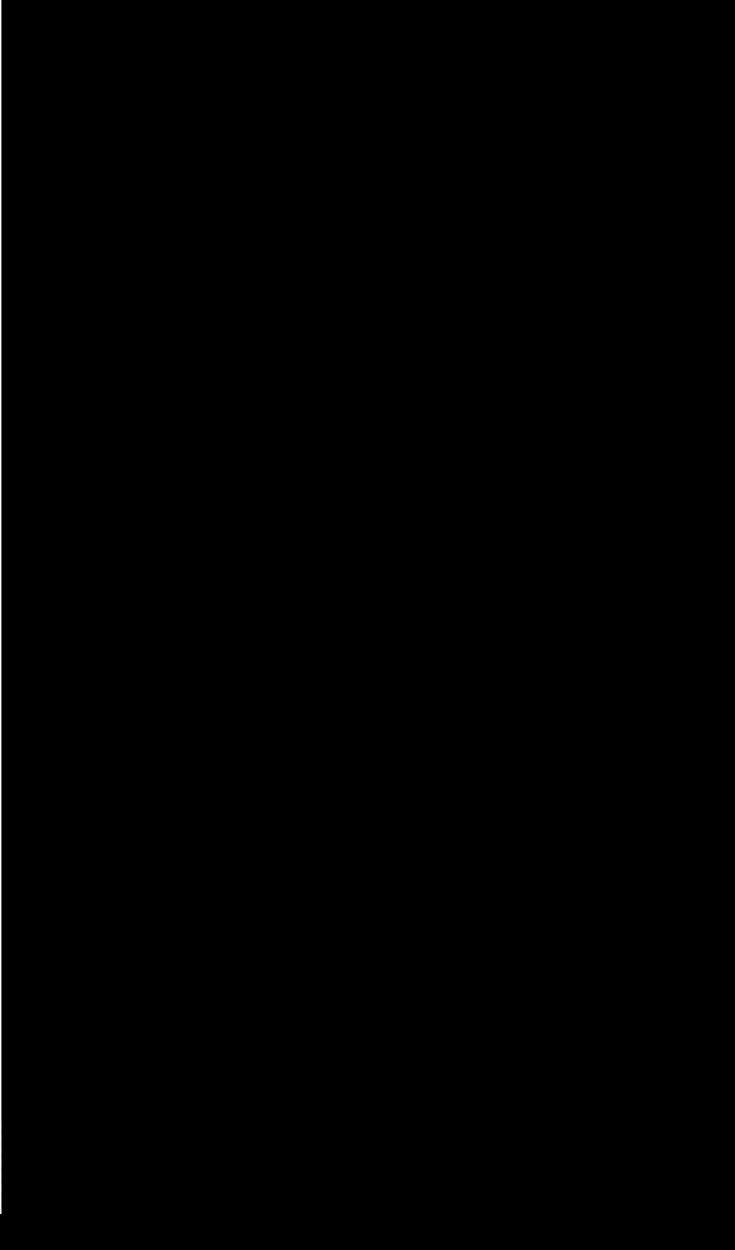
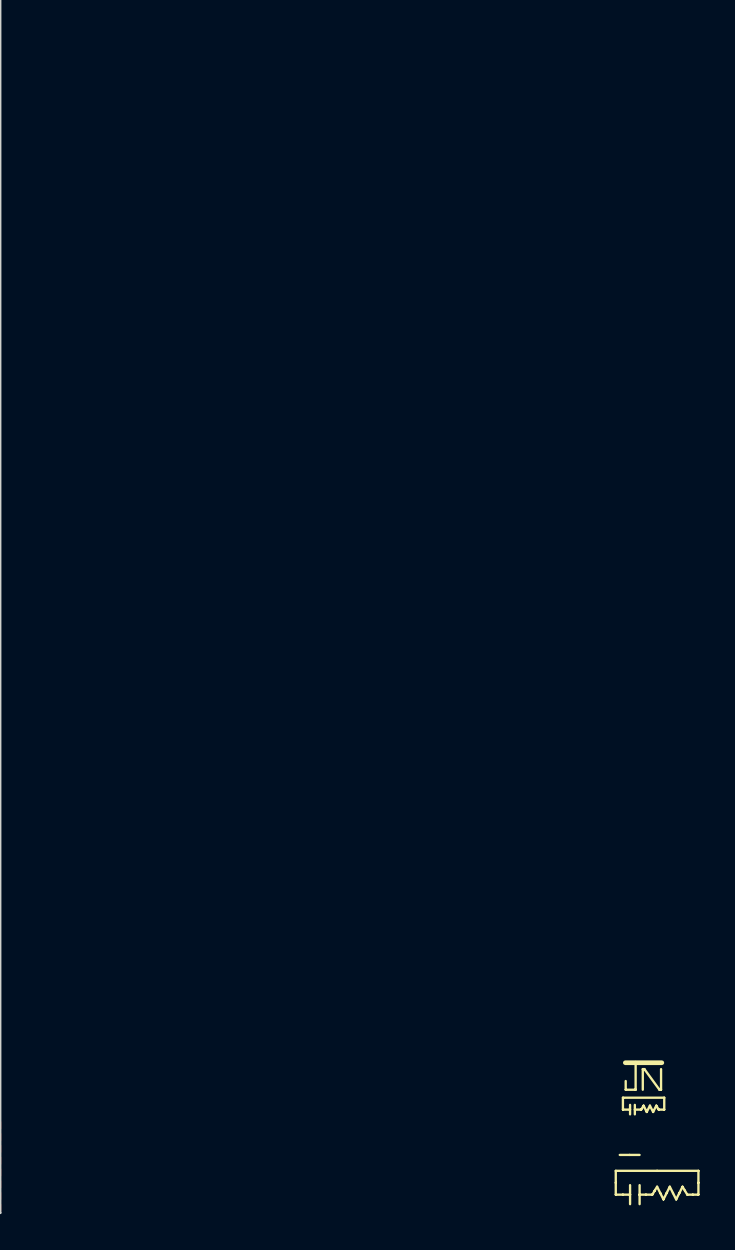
line: none -> (635, 1061) (635, 1089) (625, 1089) (625, 1081)
line: none -> (625, 1062) (661, 1062)
line: none -> (661, 1069) (661, 1089) (644, 1069) (642, 1069) (642, 1089)
line: none -> (630, 1104) (630, 1114)
line: none -> (634, 1104) (634, 1114)
line: none -> (630, 1109) (622, 1109) (622, 1097) (664, 1097) (664, 1109) (658, 1109) (656, 1105) (653, 1112) (649, 1105) (646, 1112) (643, 1105) (641, 1109) (634, 1109)
line: none -> (619, 1154) (639, 1154)
line: none -> (630, 1185) (630, 1204)
line: none -> (639, 1185) (639, 1204)
line: none -> (630, 1194) (615, 1194) (615, 1170) (698, 1170) (698, 1194) (687, 1194) (682, 1186) (676, 1199) (669, 1186) (663, 1199) (657, 1186) (652, 1194) (639, 1194)

